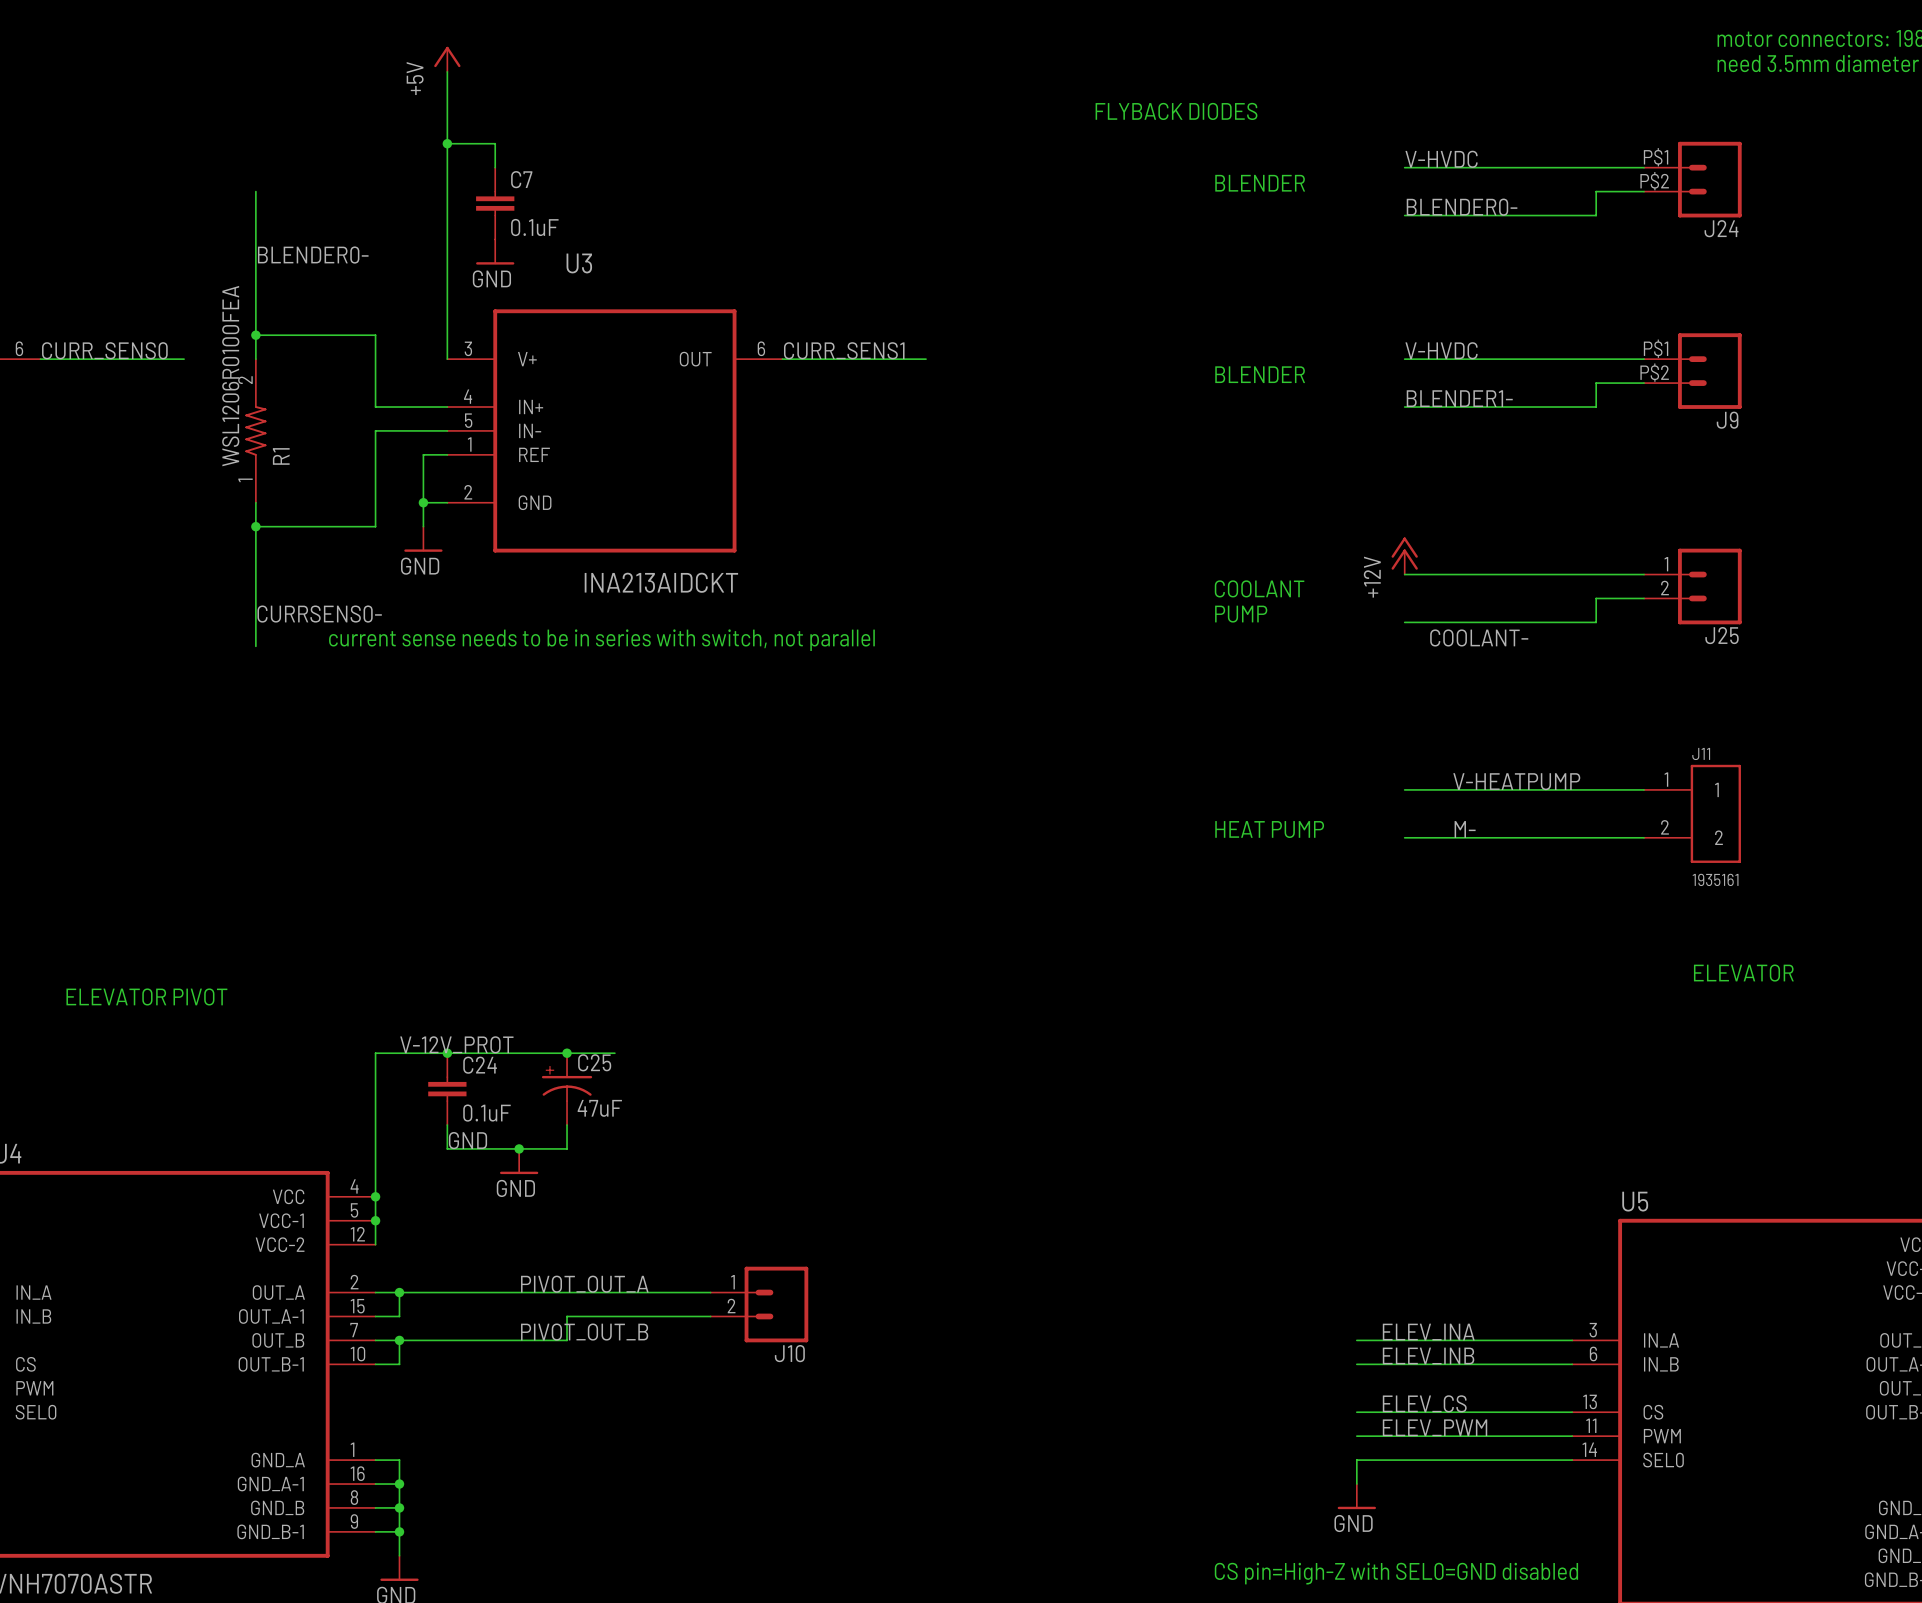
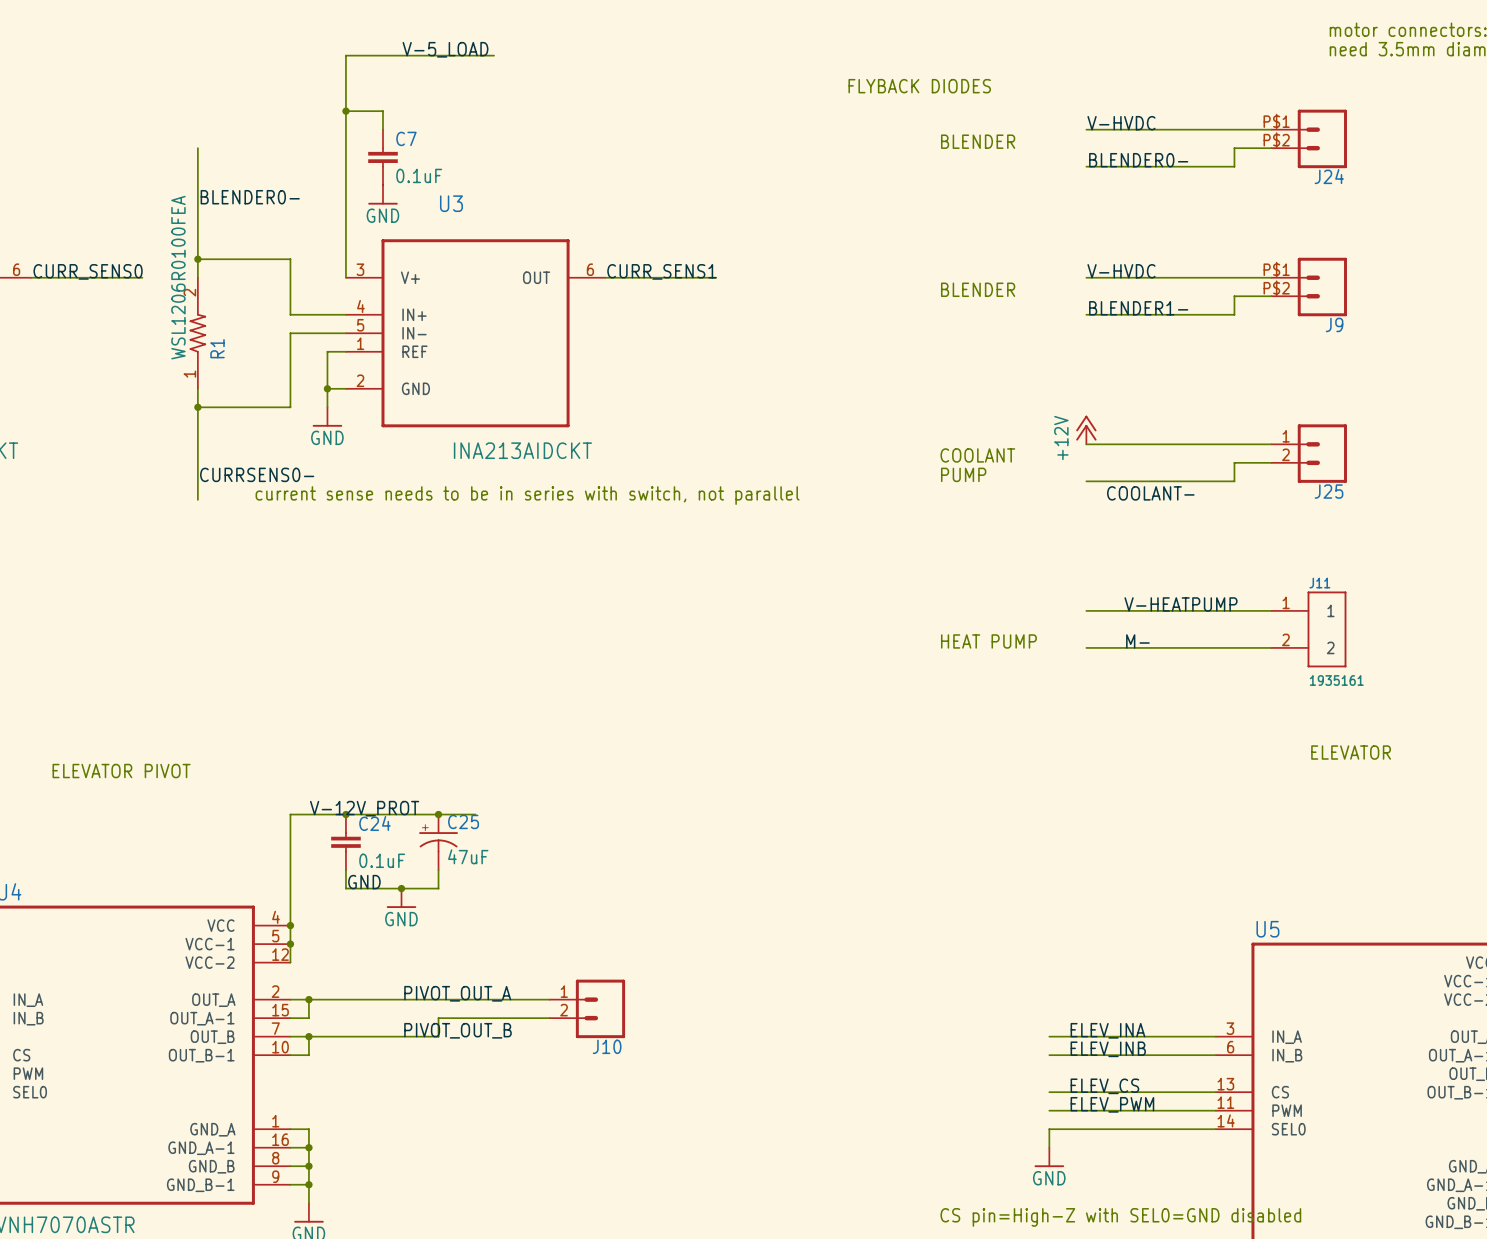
power symbol: +5V (447, 59) -> none
label: none -> V-5_LOAD (445, 49)
wire: none -> (345, 55) (494, 55)

